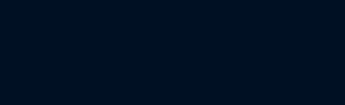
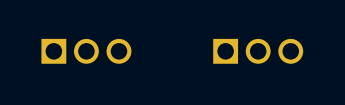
part: none -> (86, 51)
part: none -> (258, 51)

